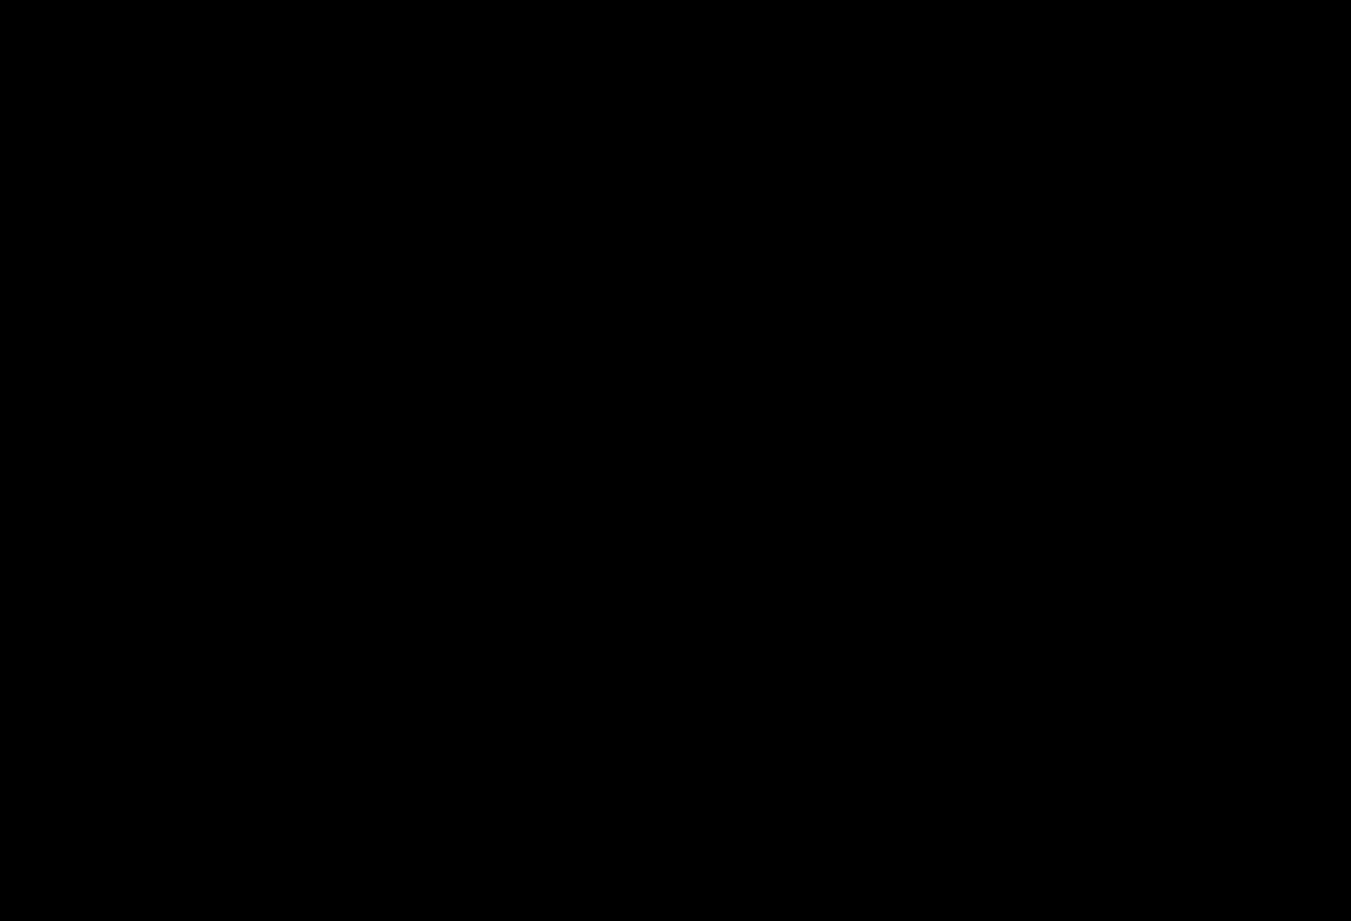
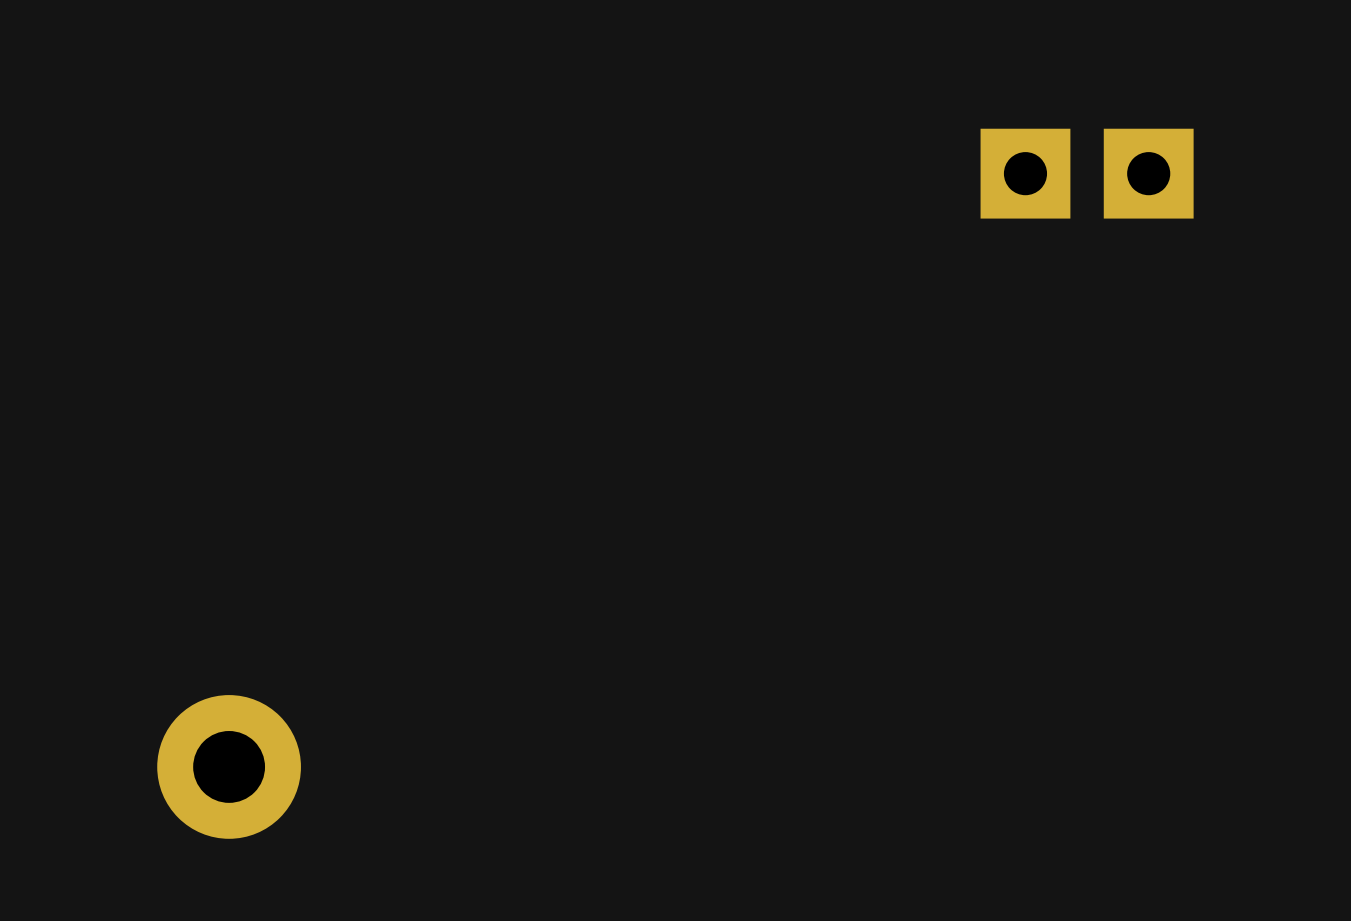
part: none -> (1025, 173)
part: none -> (1148, 173)
part: none -> (229, 766)

